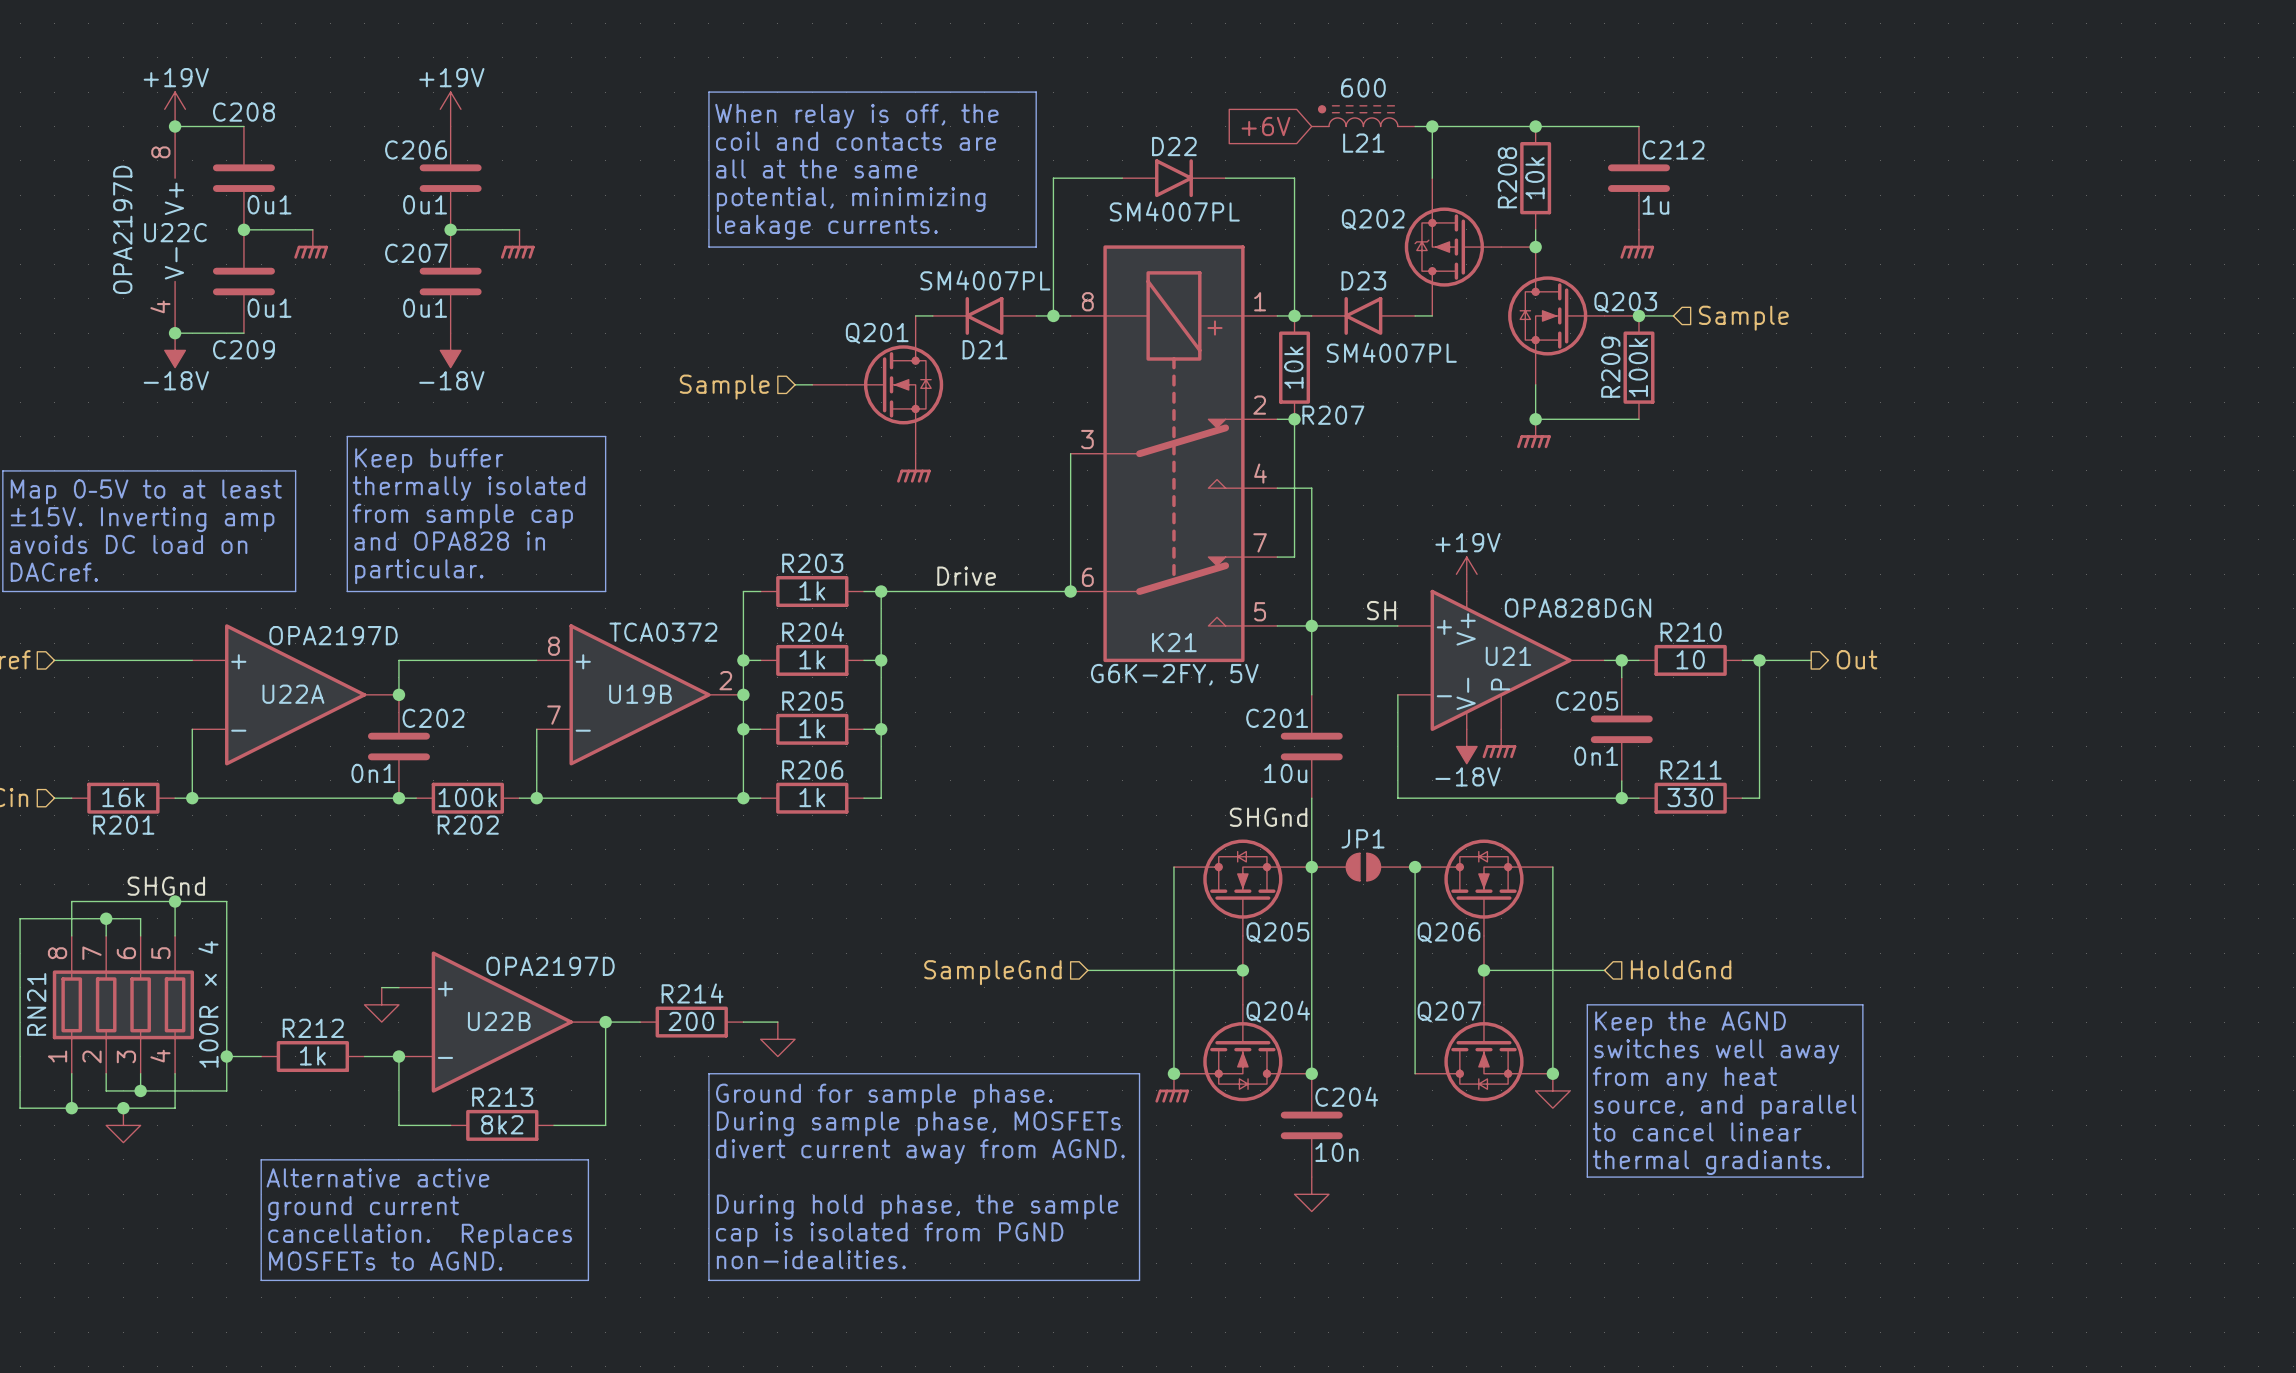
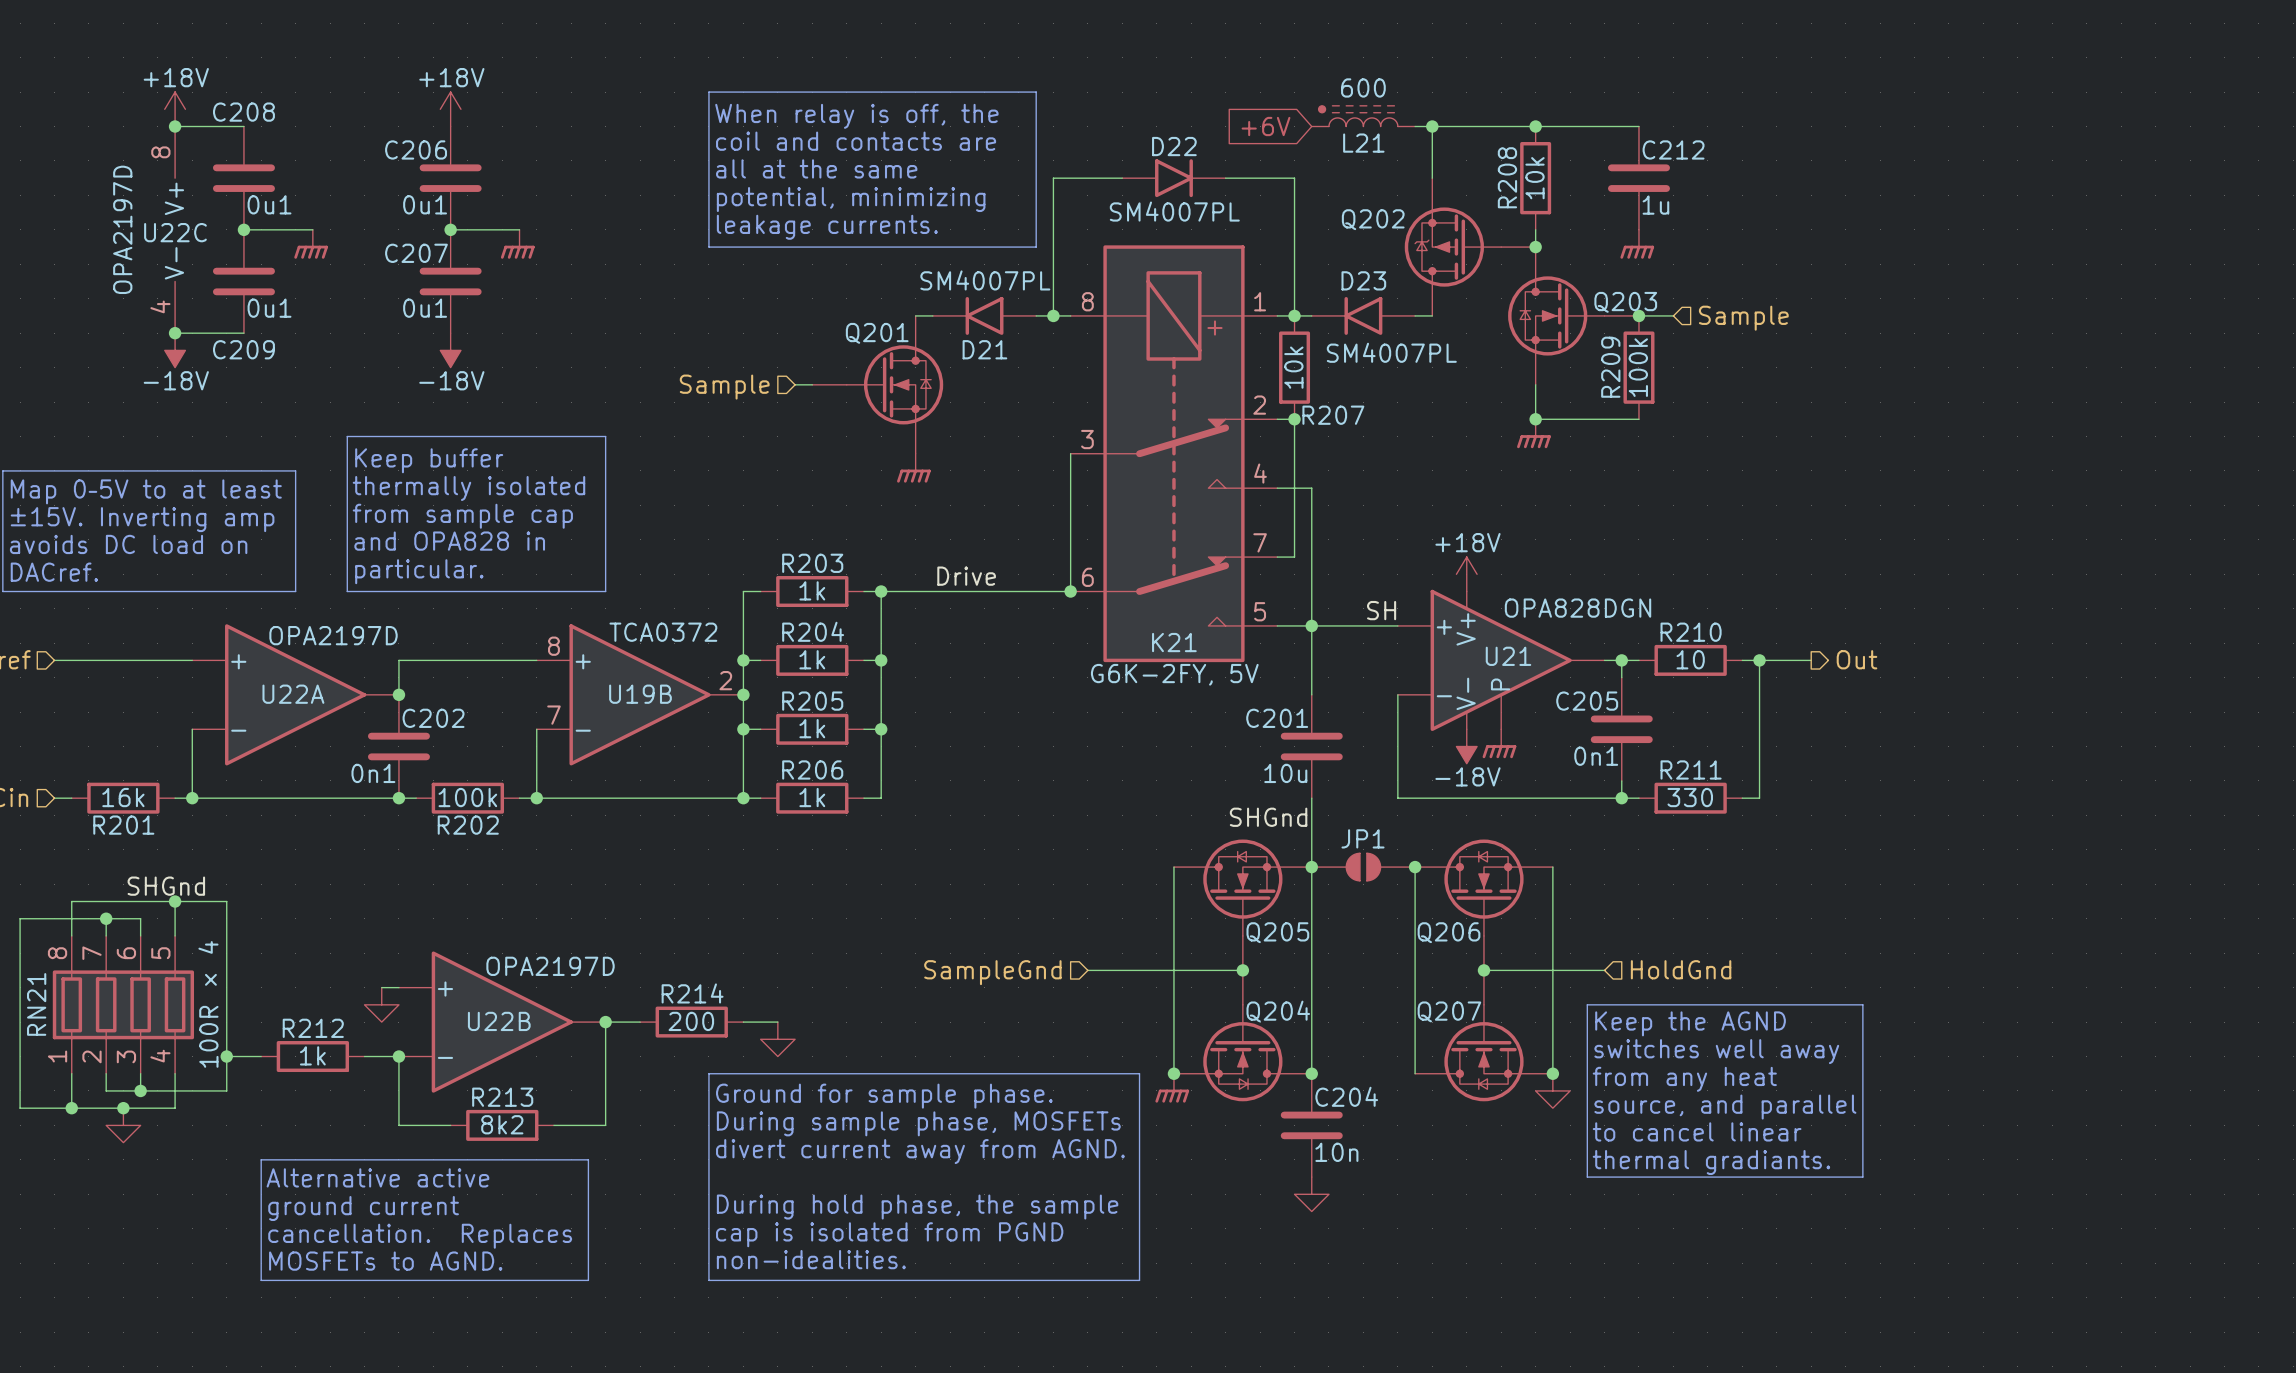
power symbol: +19V (175, 109) -> +18V (175, 109)
power symbol: +19V (450, 109) -> +18V (450, 109)
power symbol: +19V (1466, 574) -> +18V (1466, 574)

